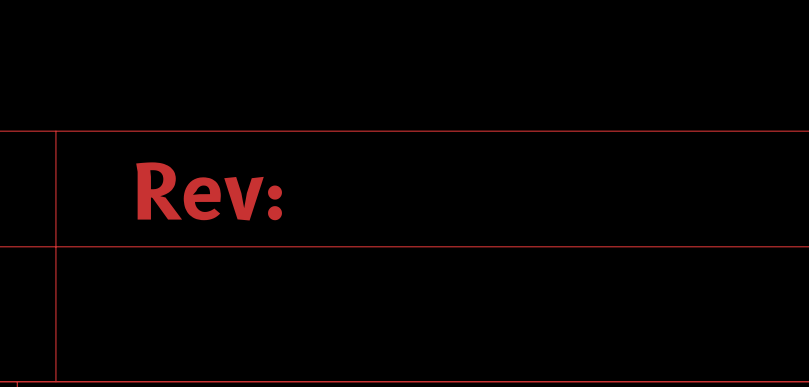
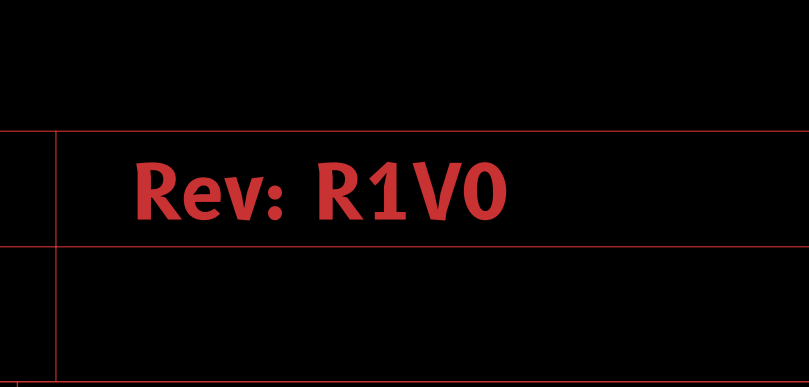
title block: Rev: (209, 191) -> Rev: R1V0 (321, 191)

